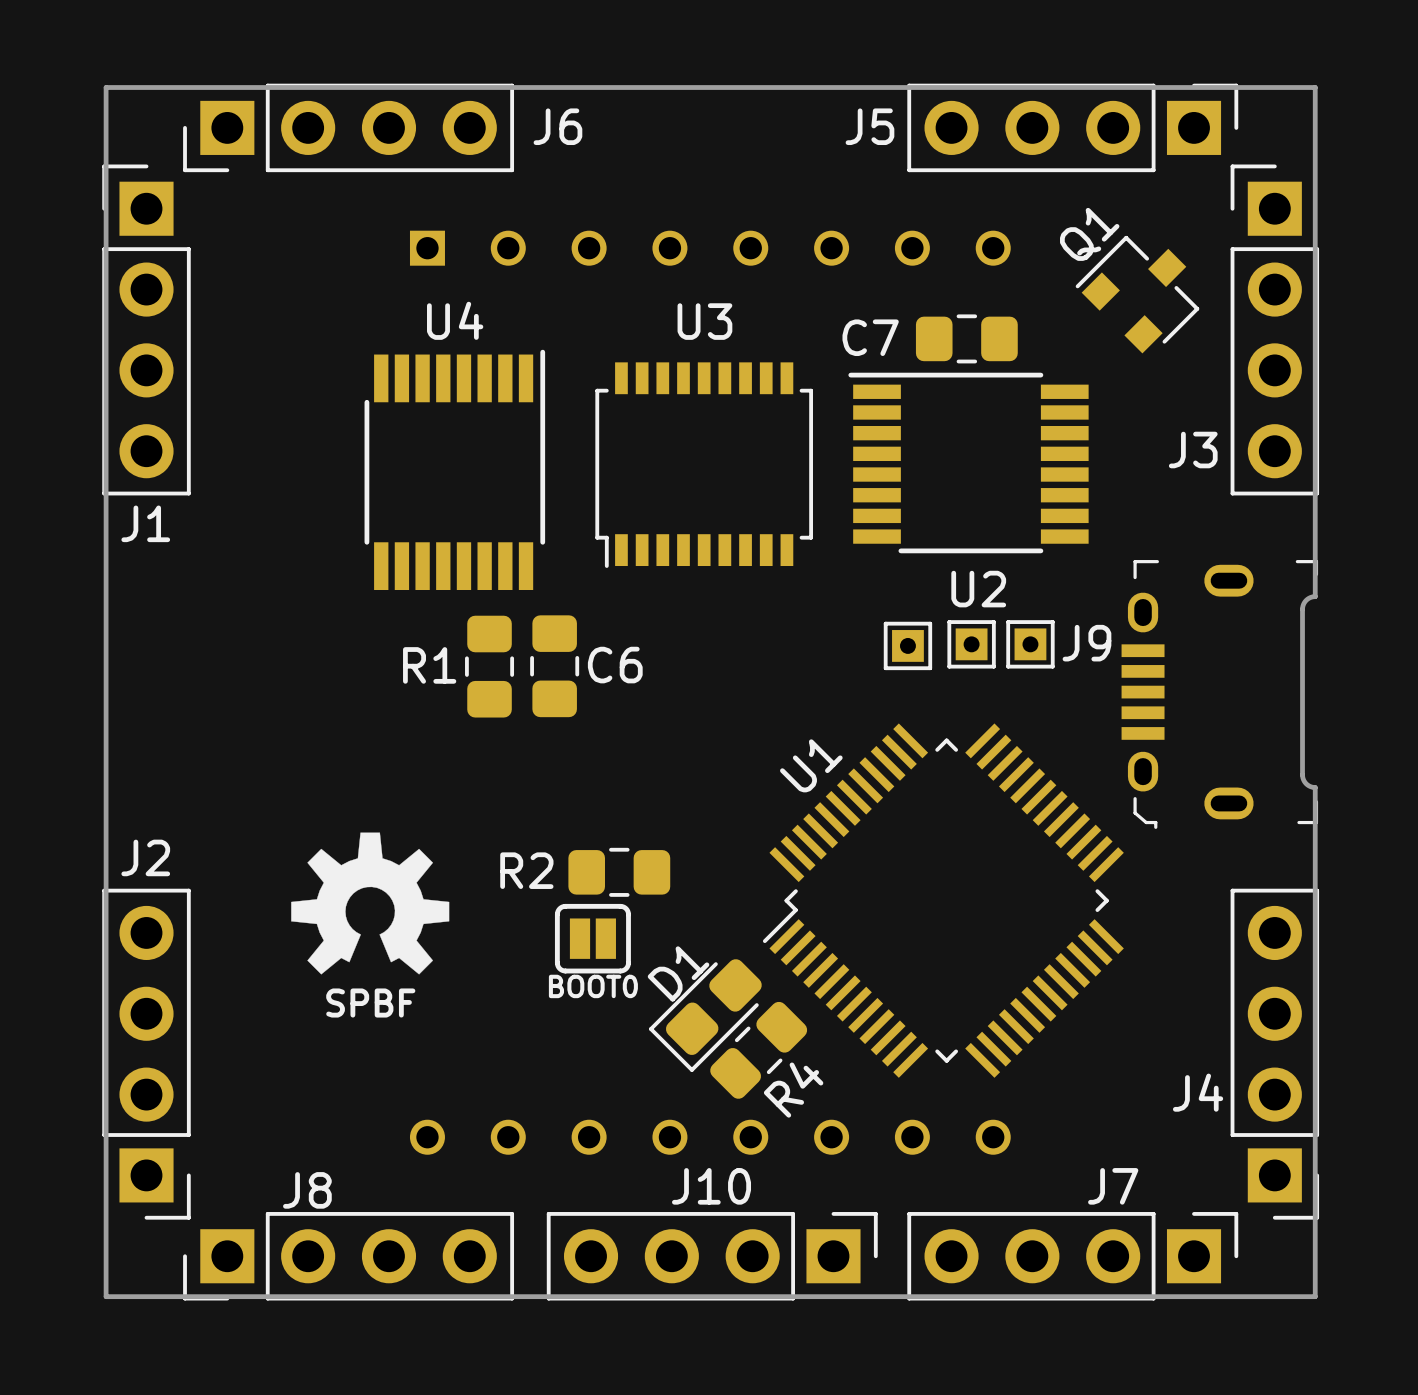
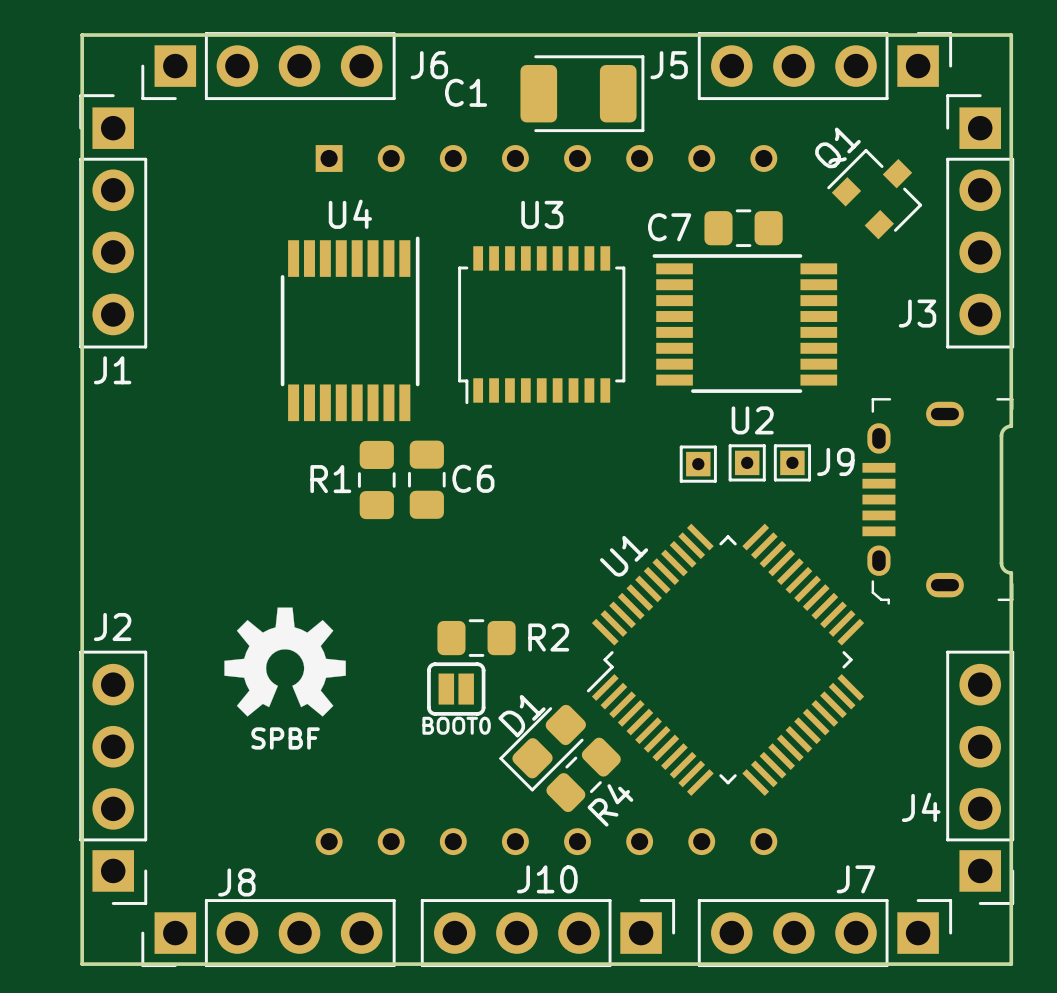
C1: none -> (582, 93)
R2 name position: R2 (526, 870) -> R2 (548, 637)

